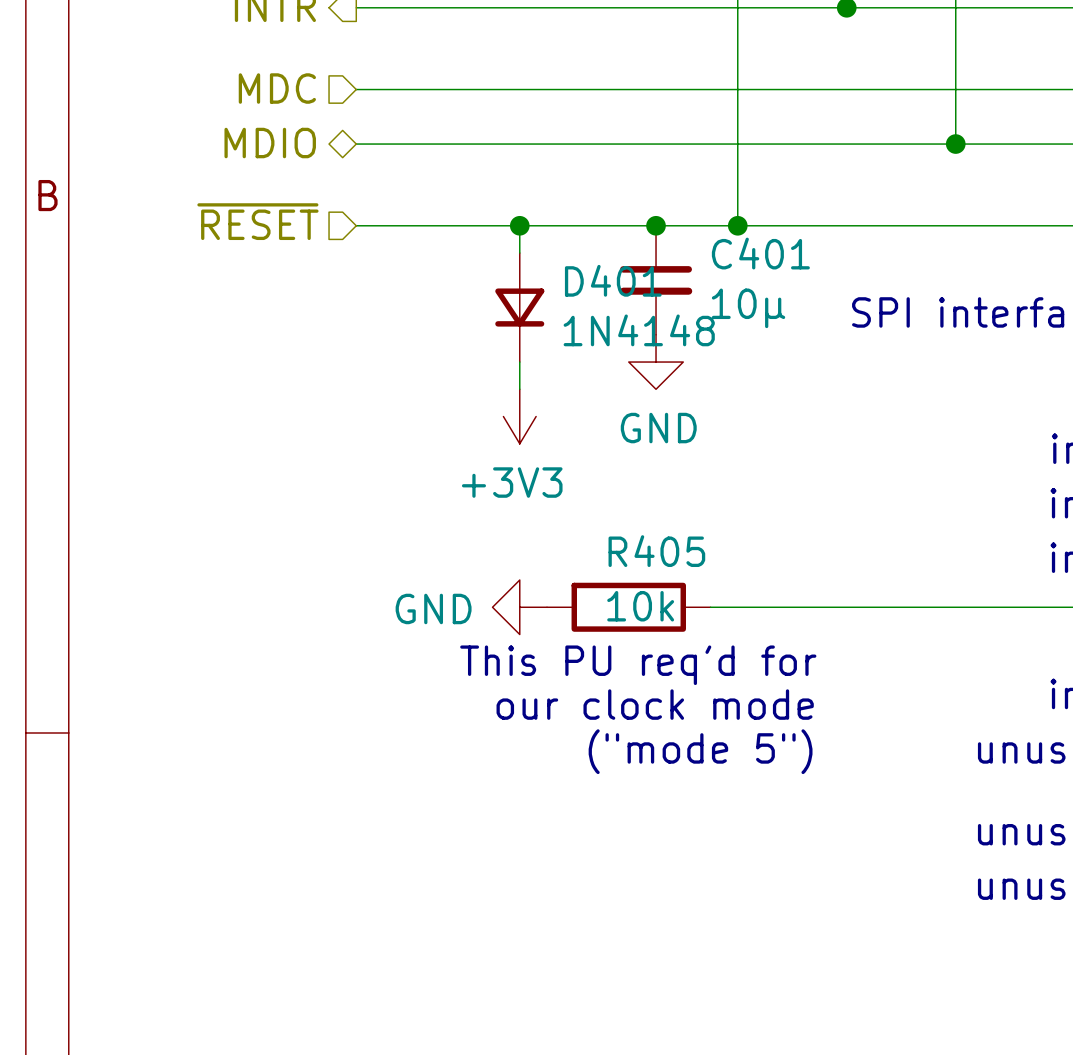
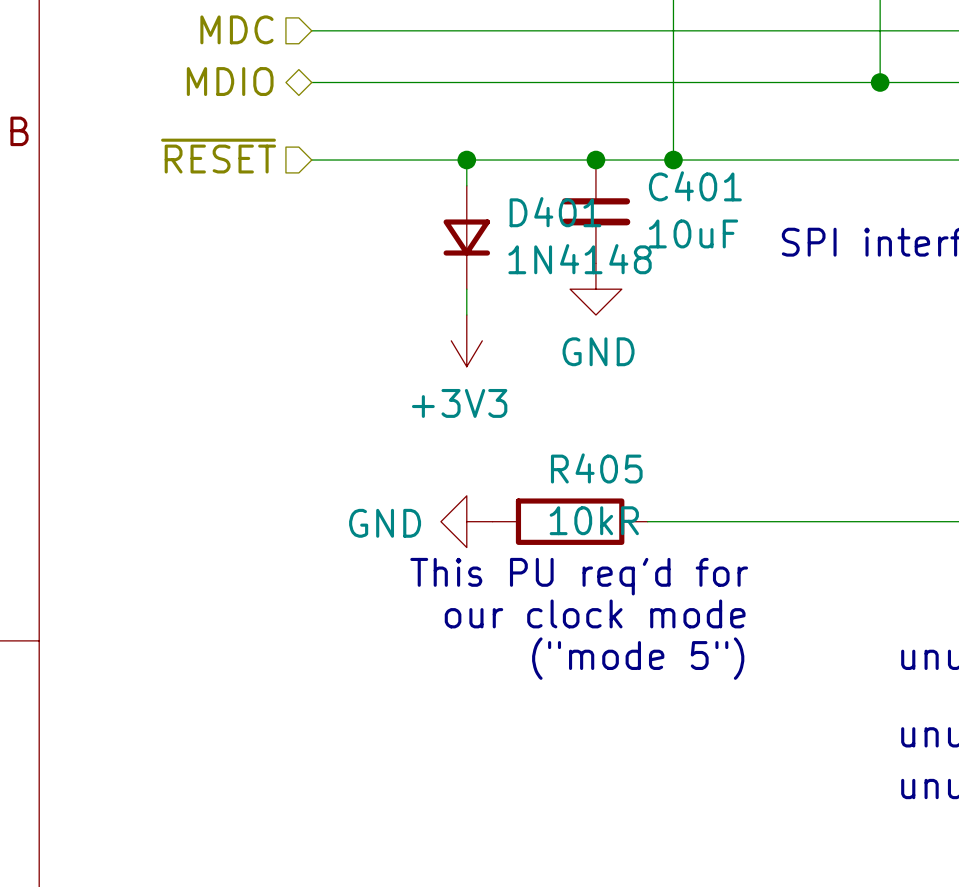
C401 value: 10µ (748, 308) -> 10uF (693, 233)
R405 value: 10k (640, 606) -> 10kR (594, 520)

